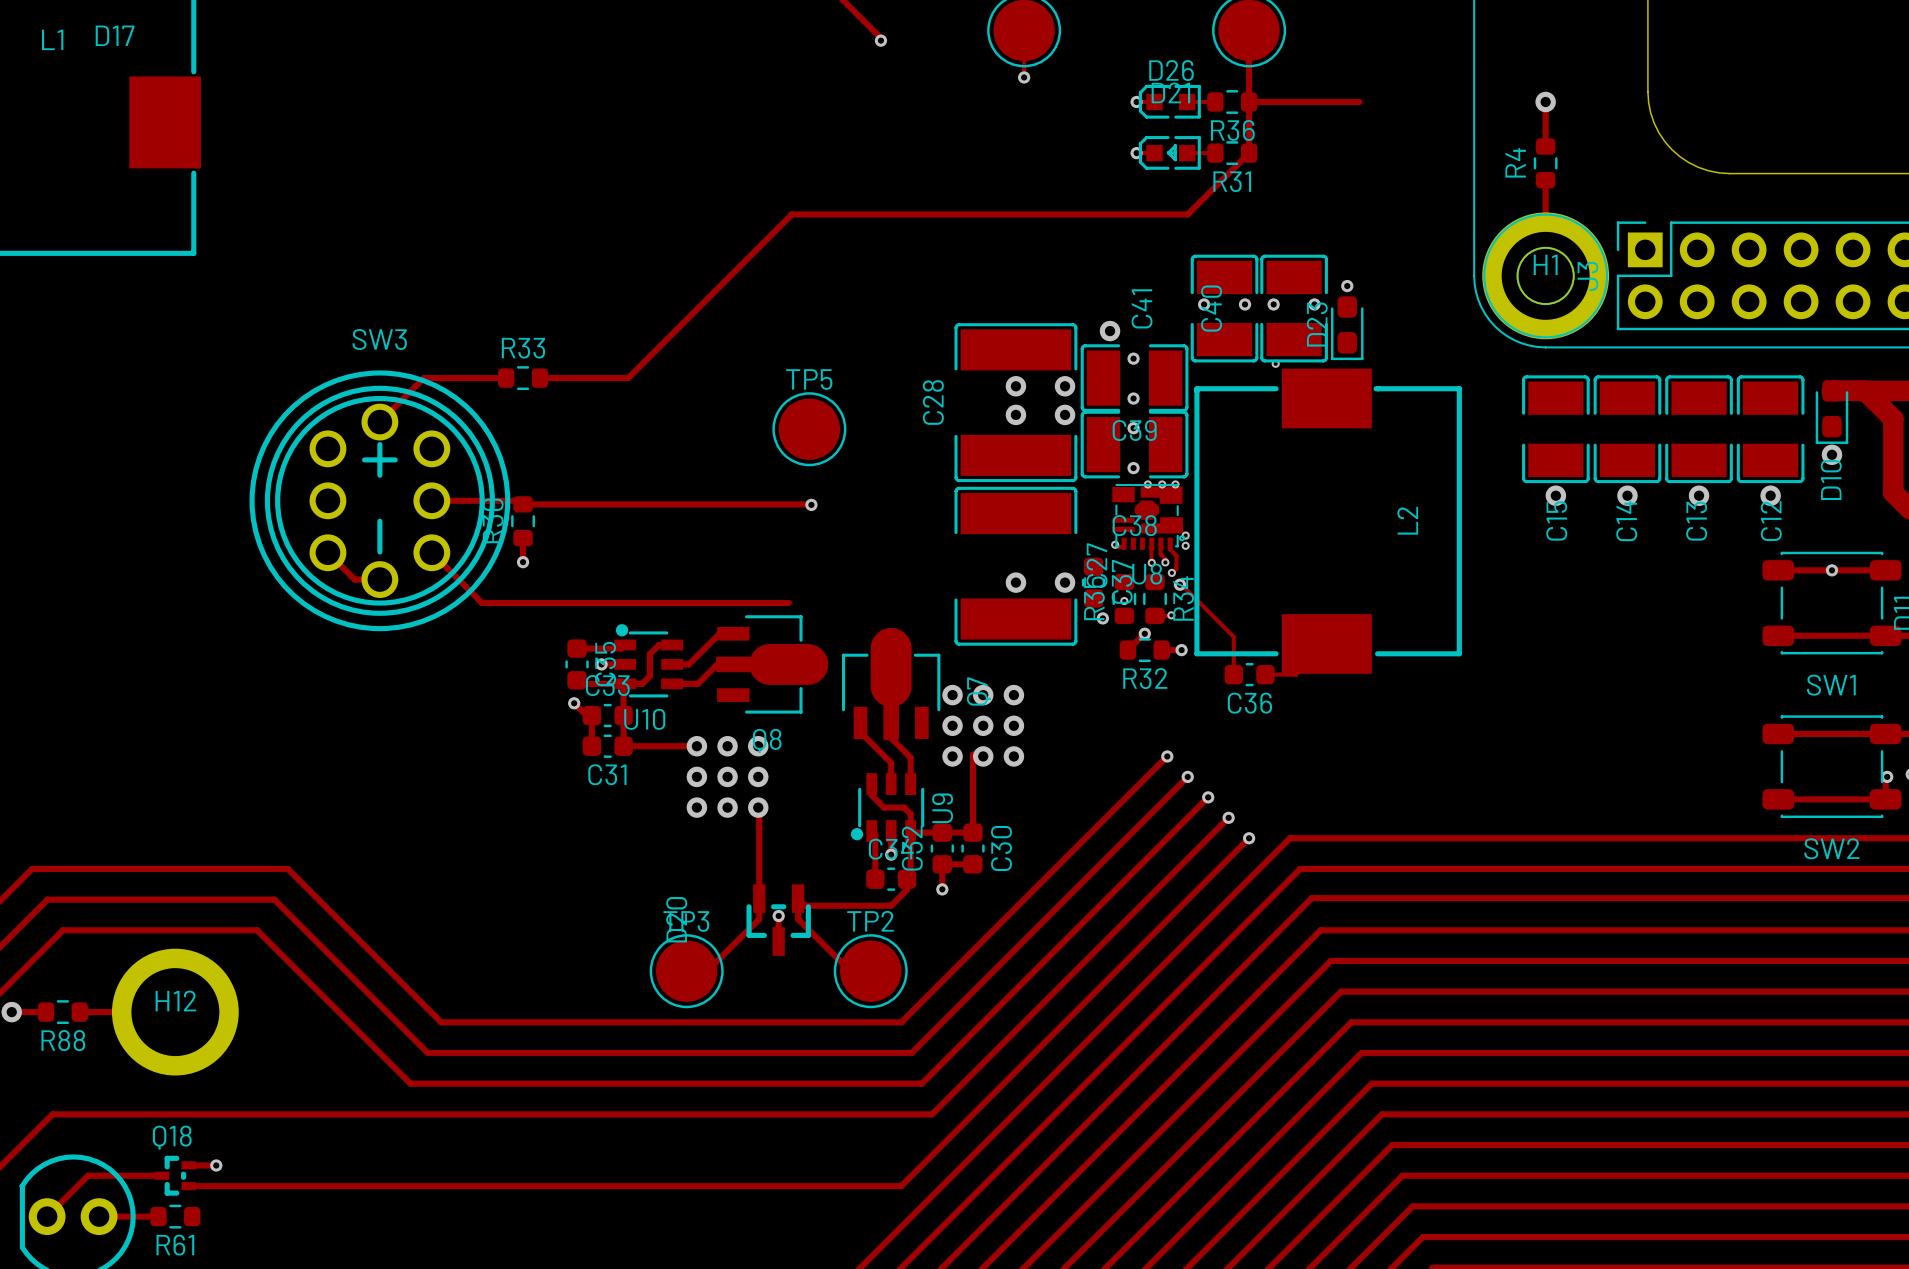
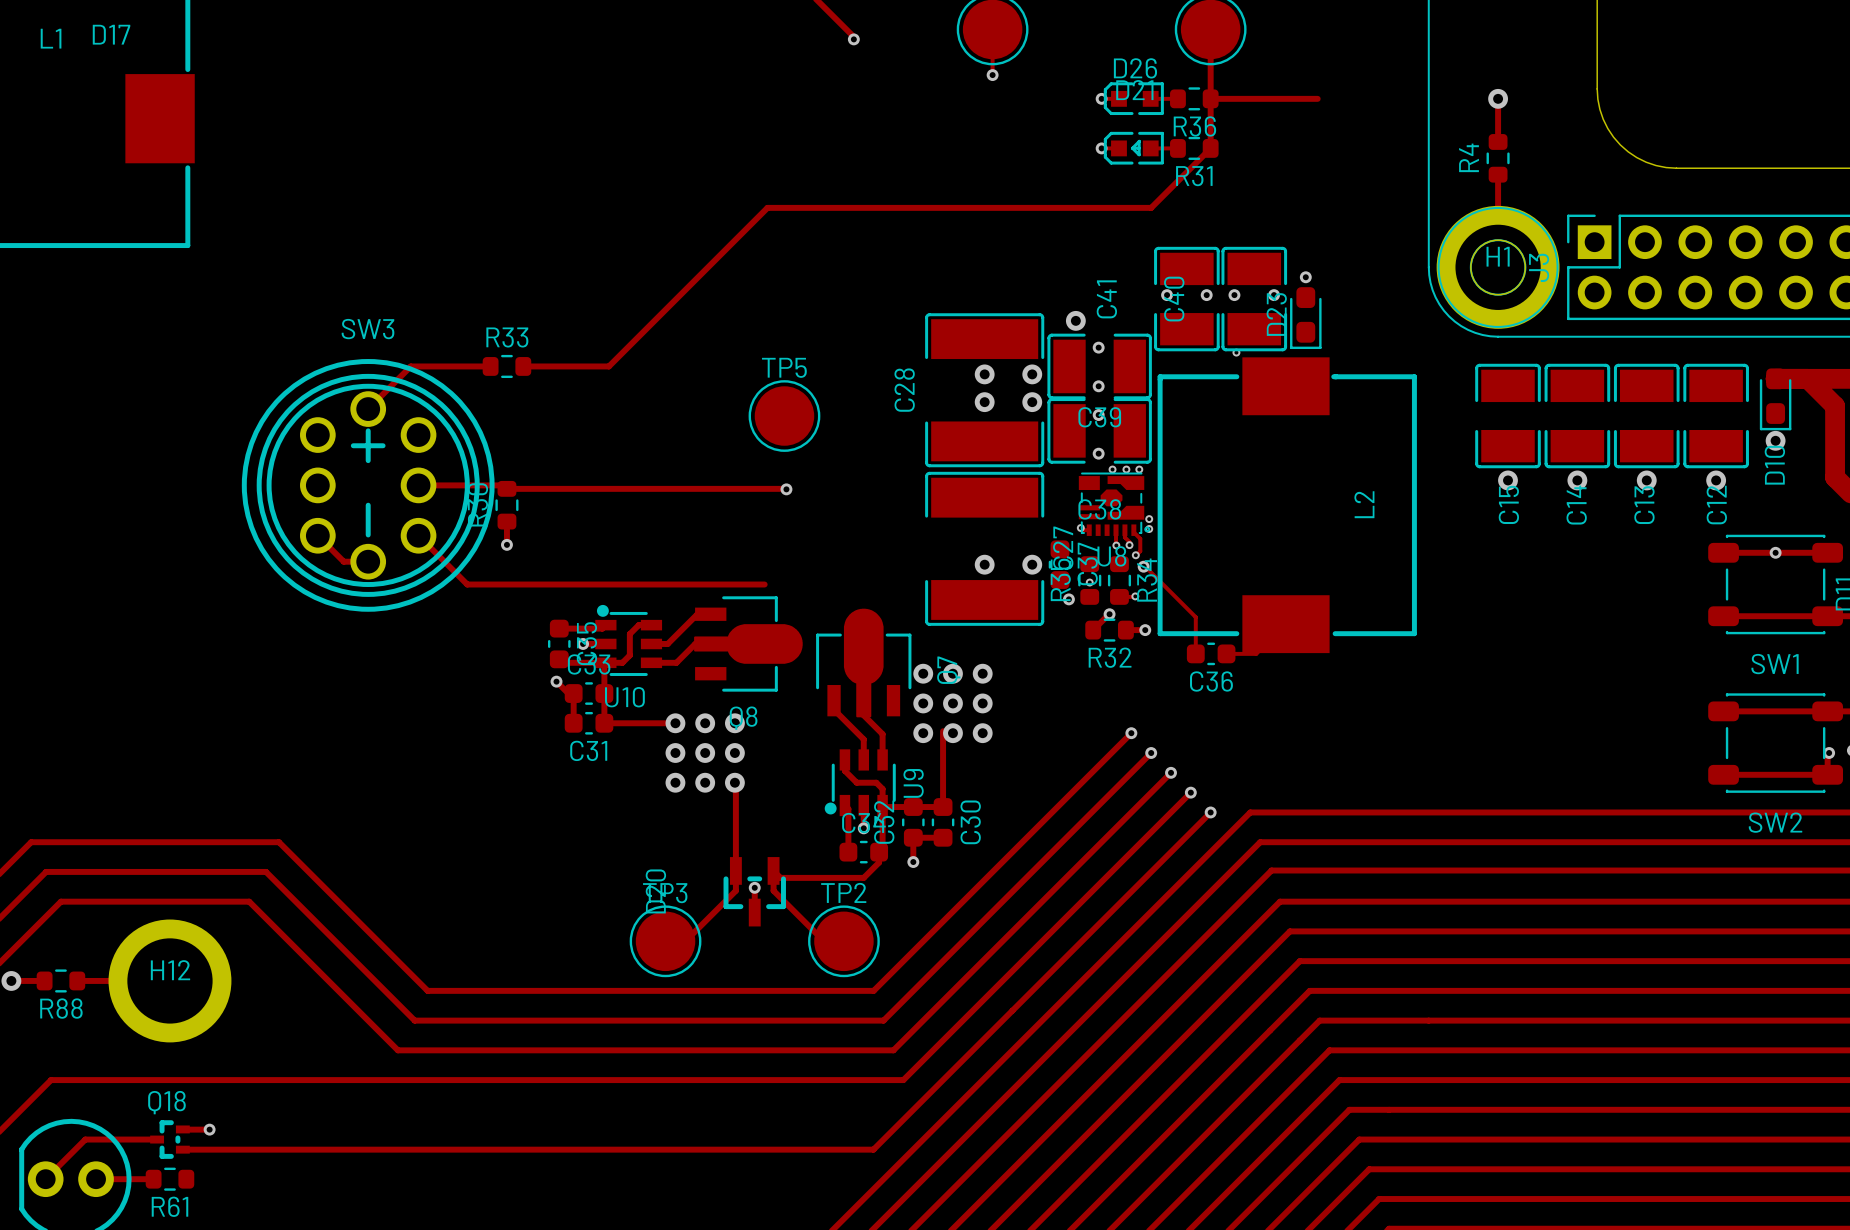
U8 footprint: [1112, 484, 1186, 550] -> [1078, 472, 1151, 536]

